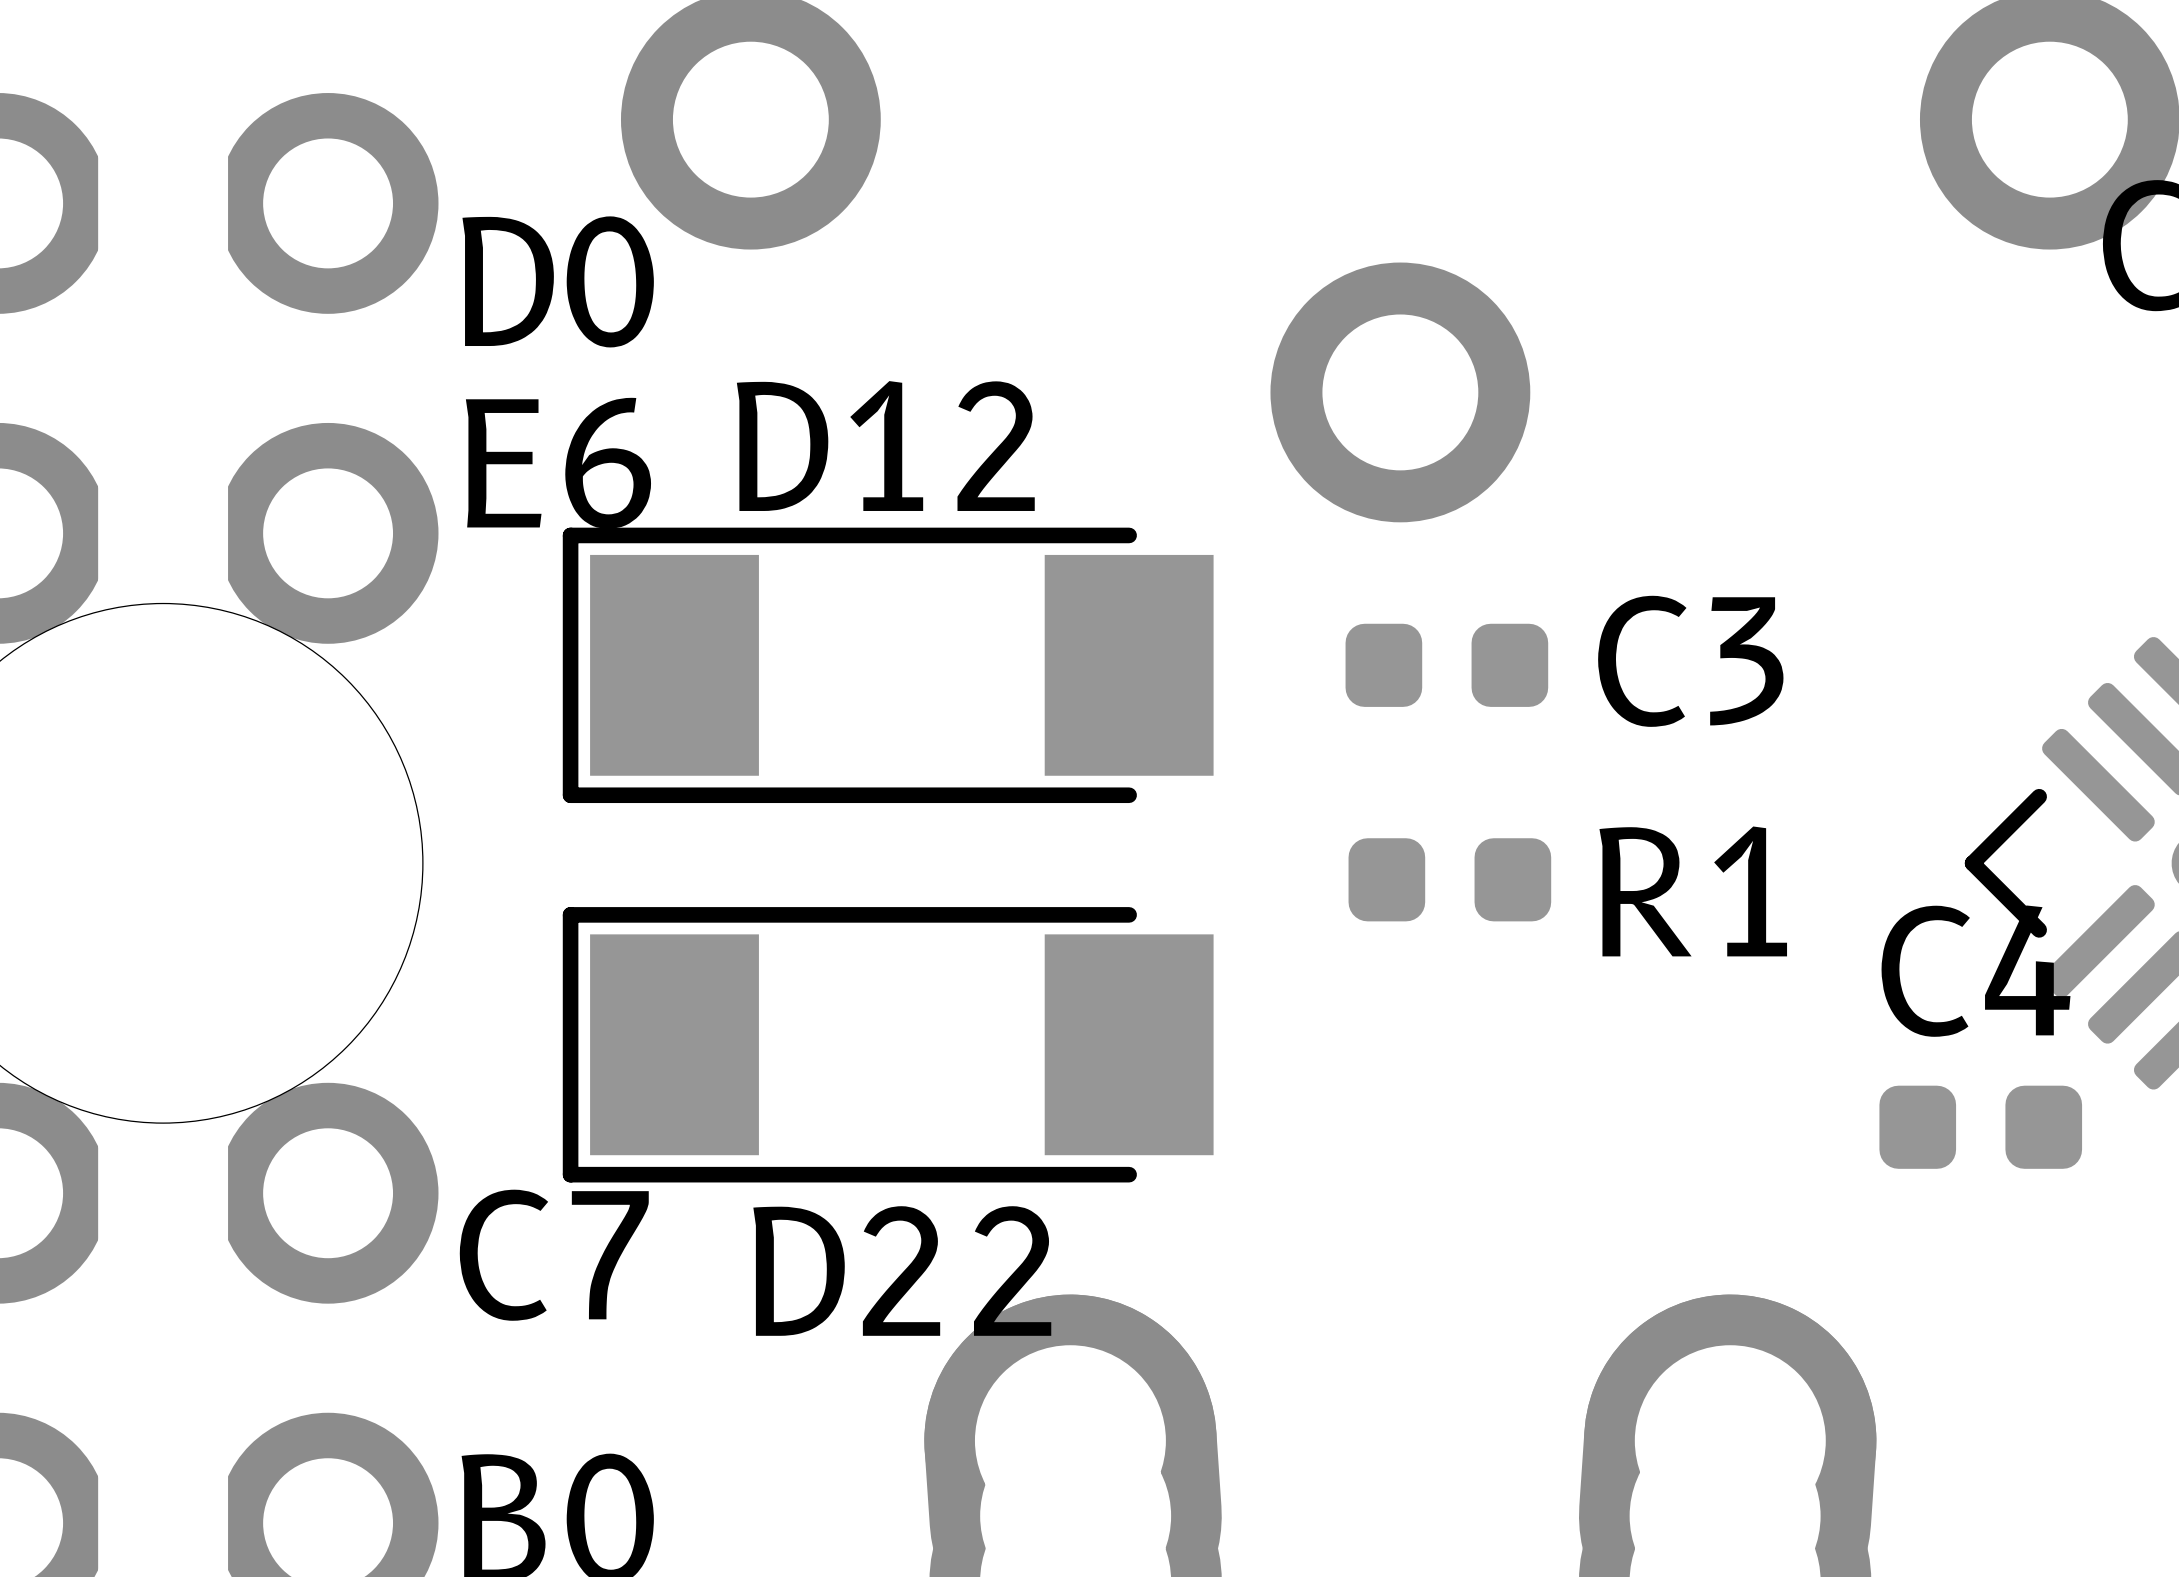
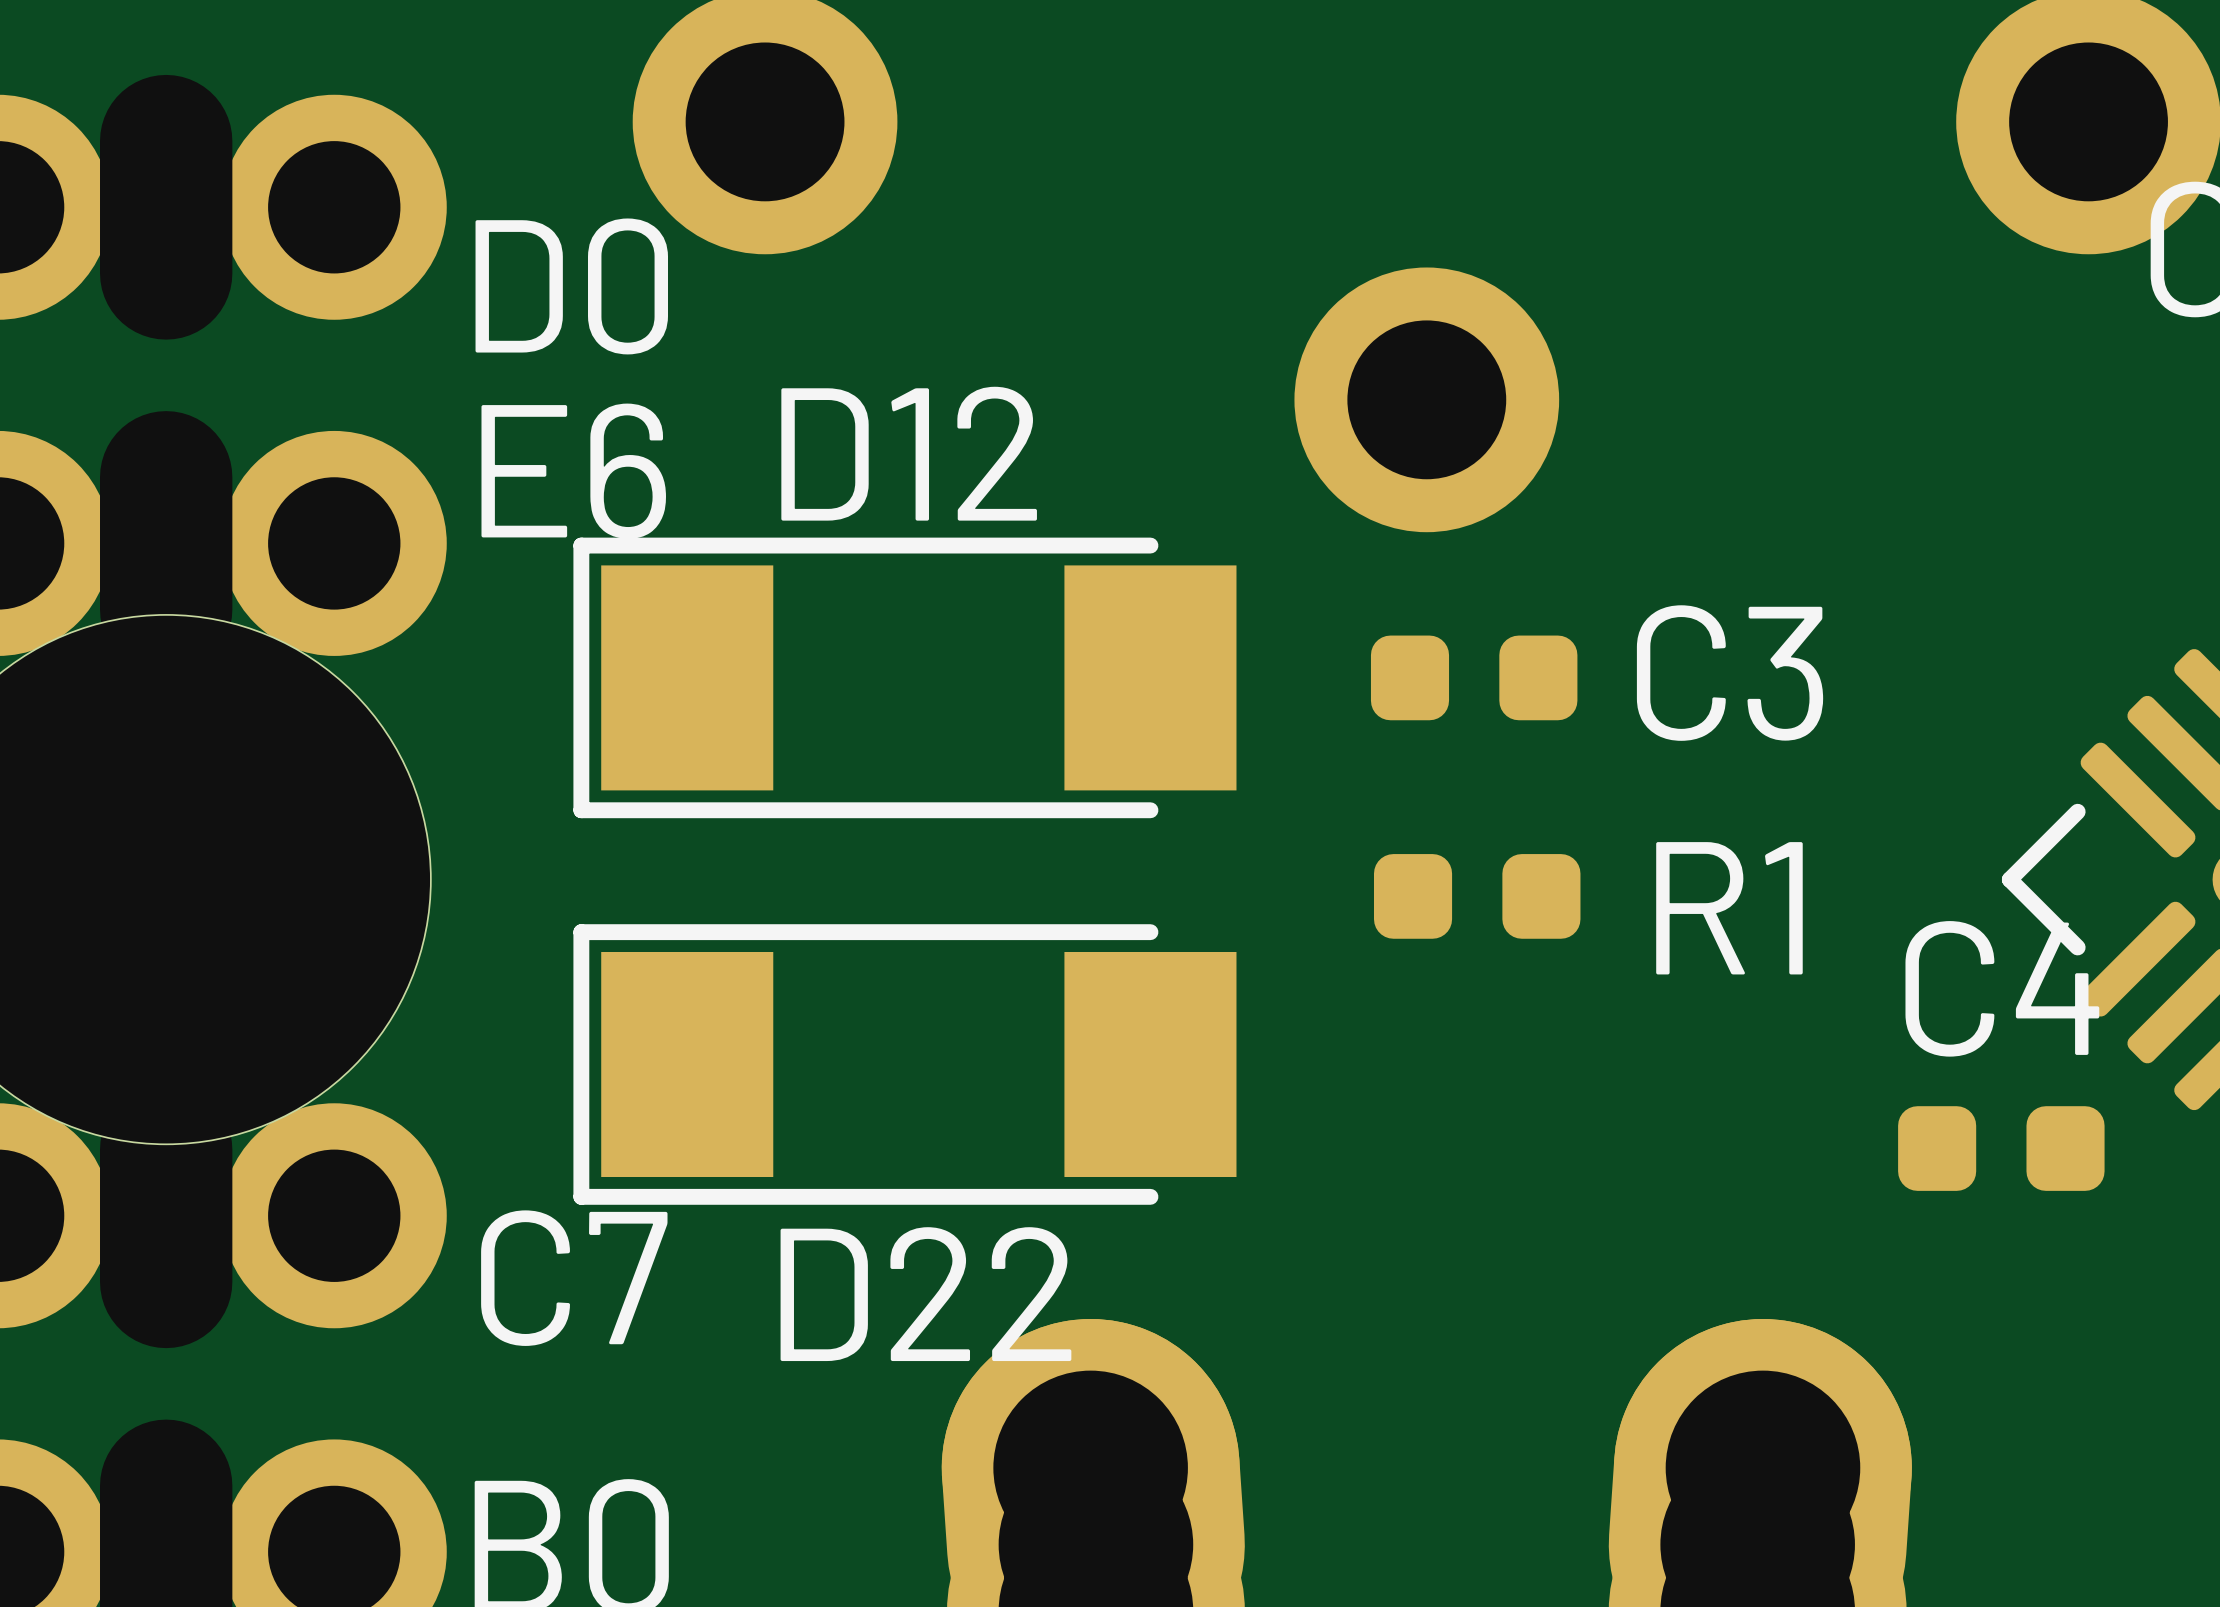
C4 position: (1980, 1127) -> (2001, 1148)

